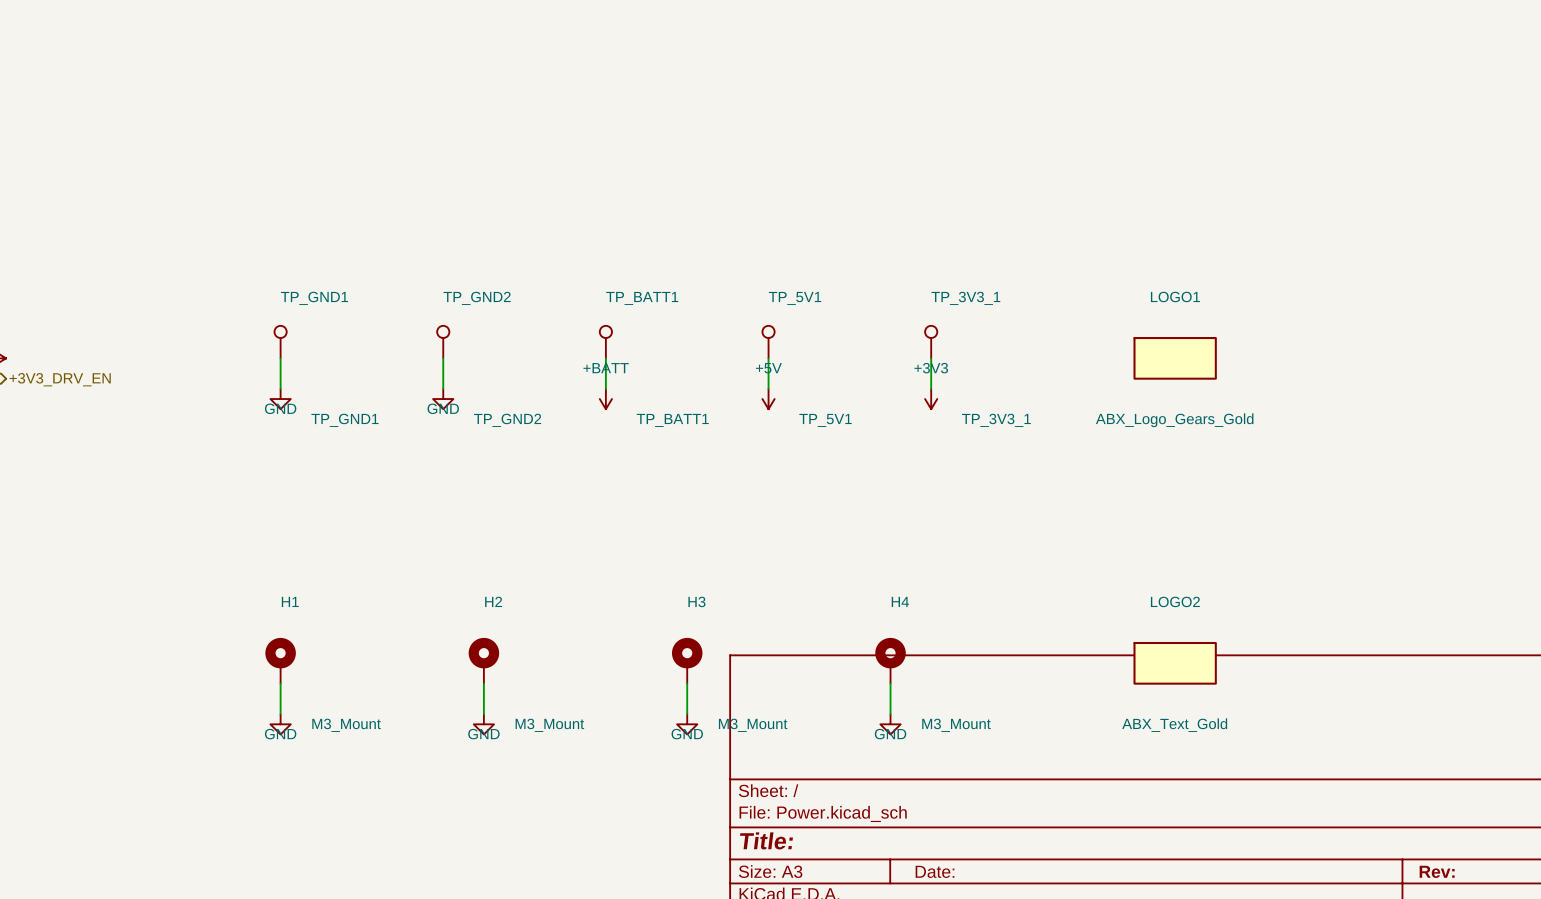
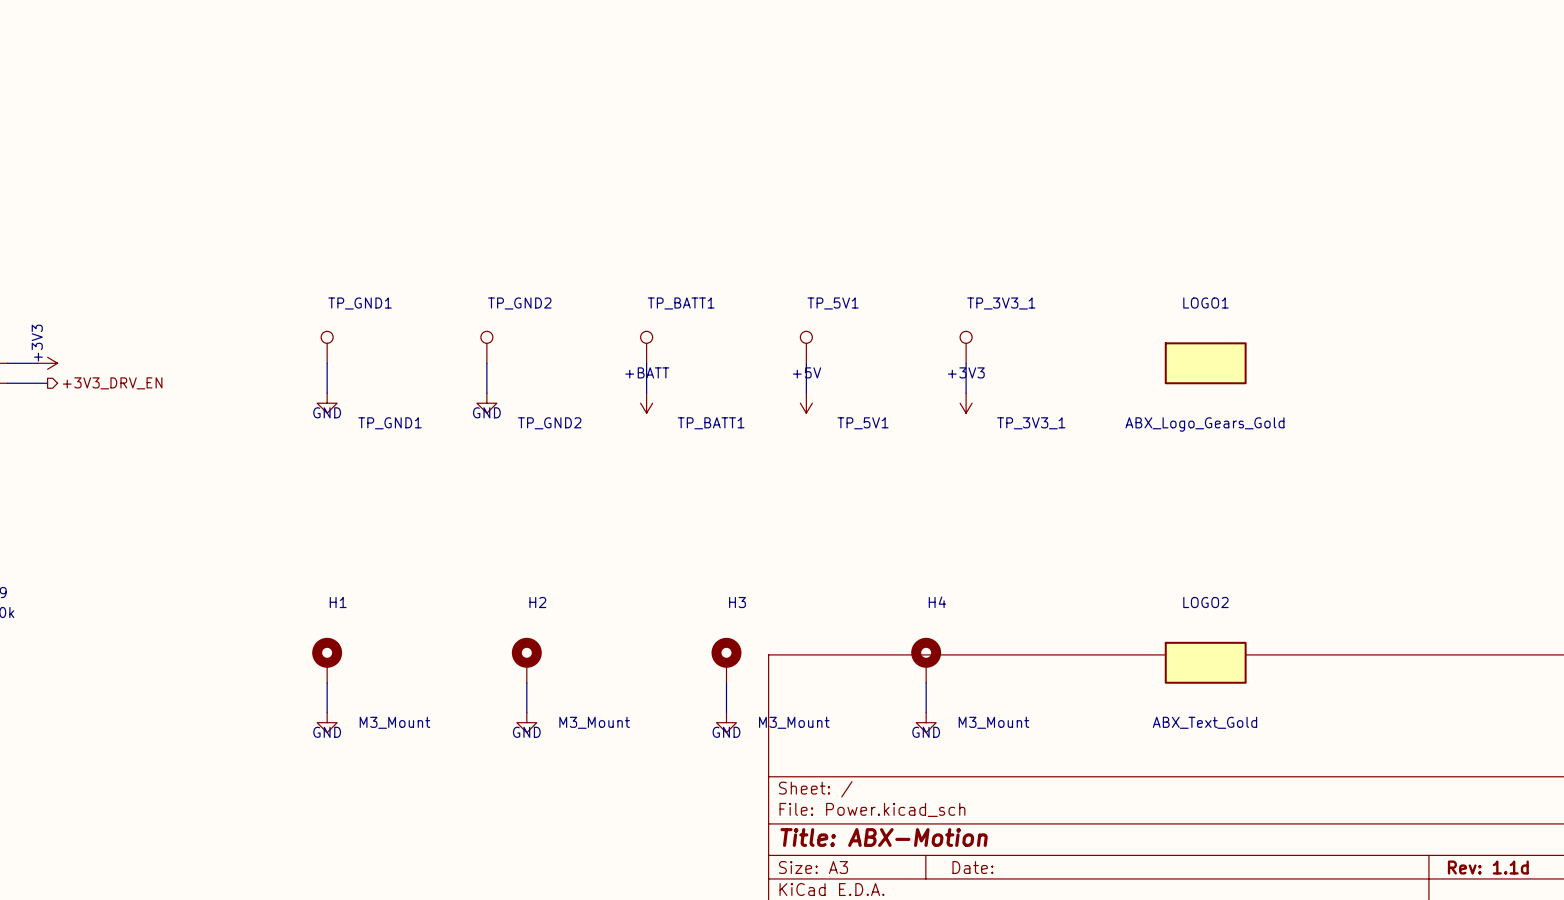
title block: Title: (766, 840) -> Title: ABX-Motion (884, 837)
title block: Rev: (1437, 871) -> Rev: 1.1d (1488, 867)

